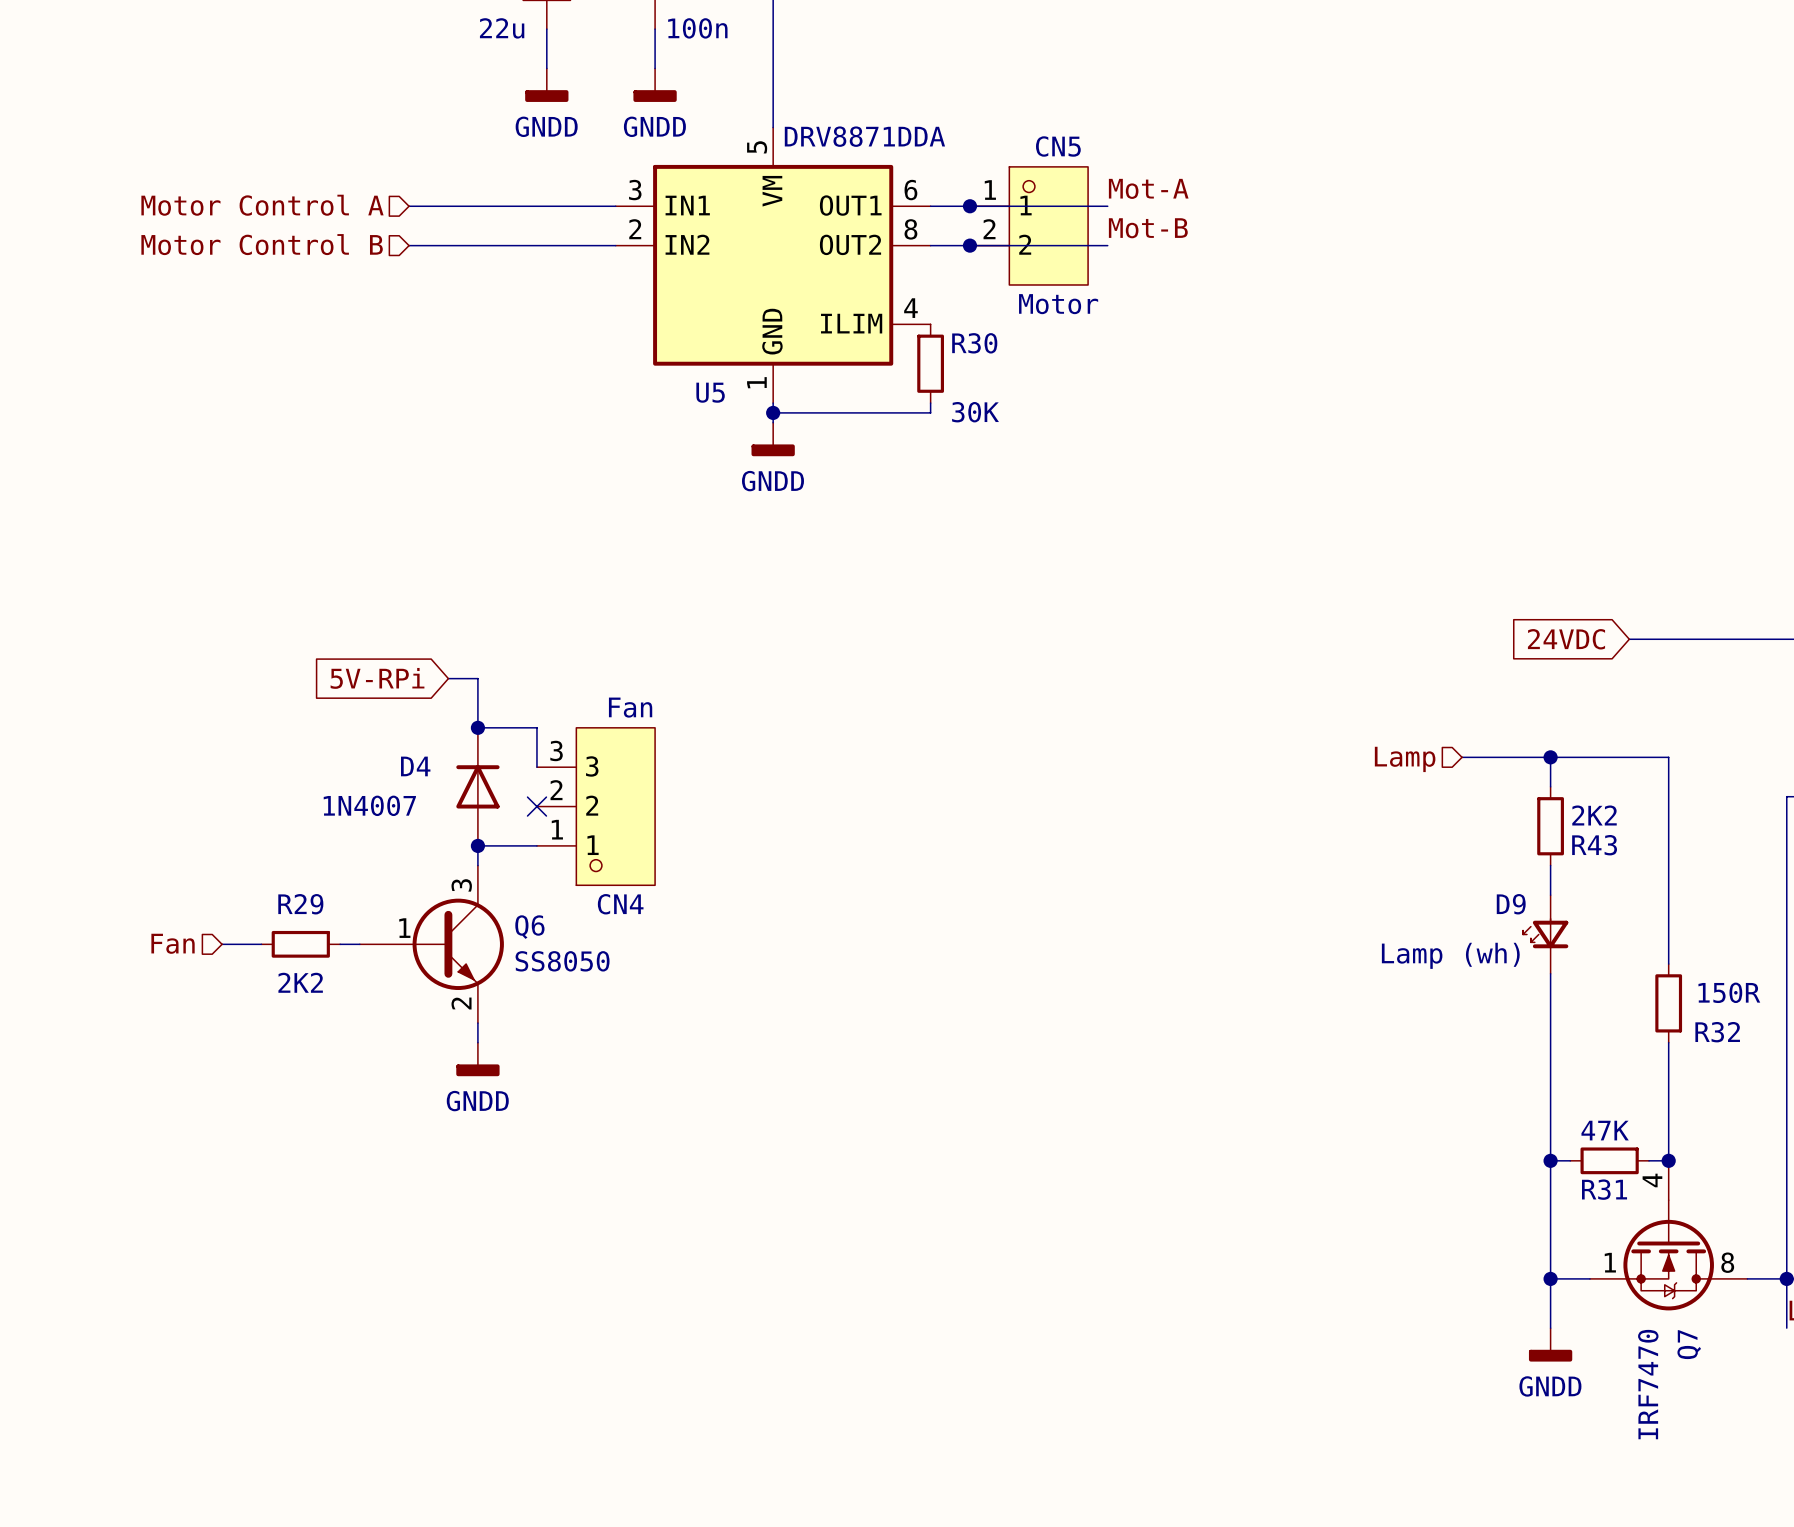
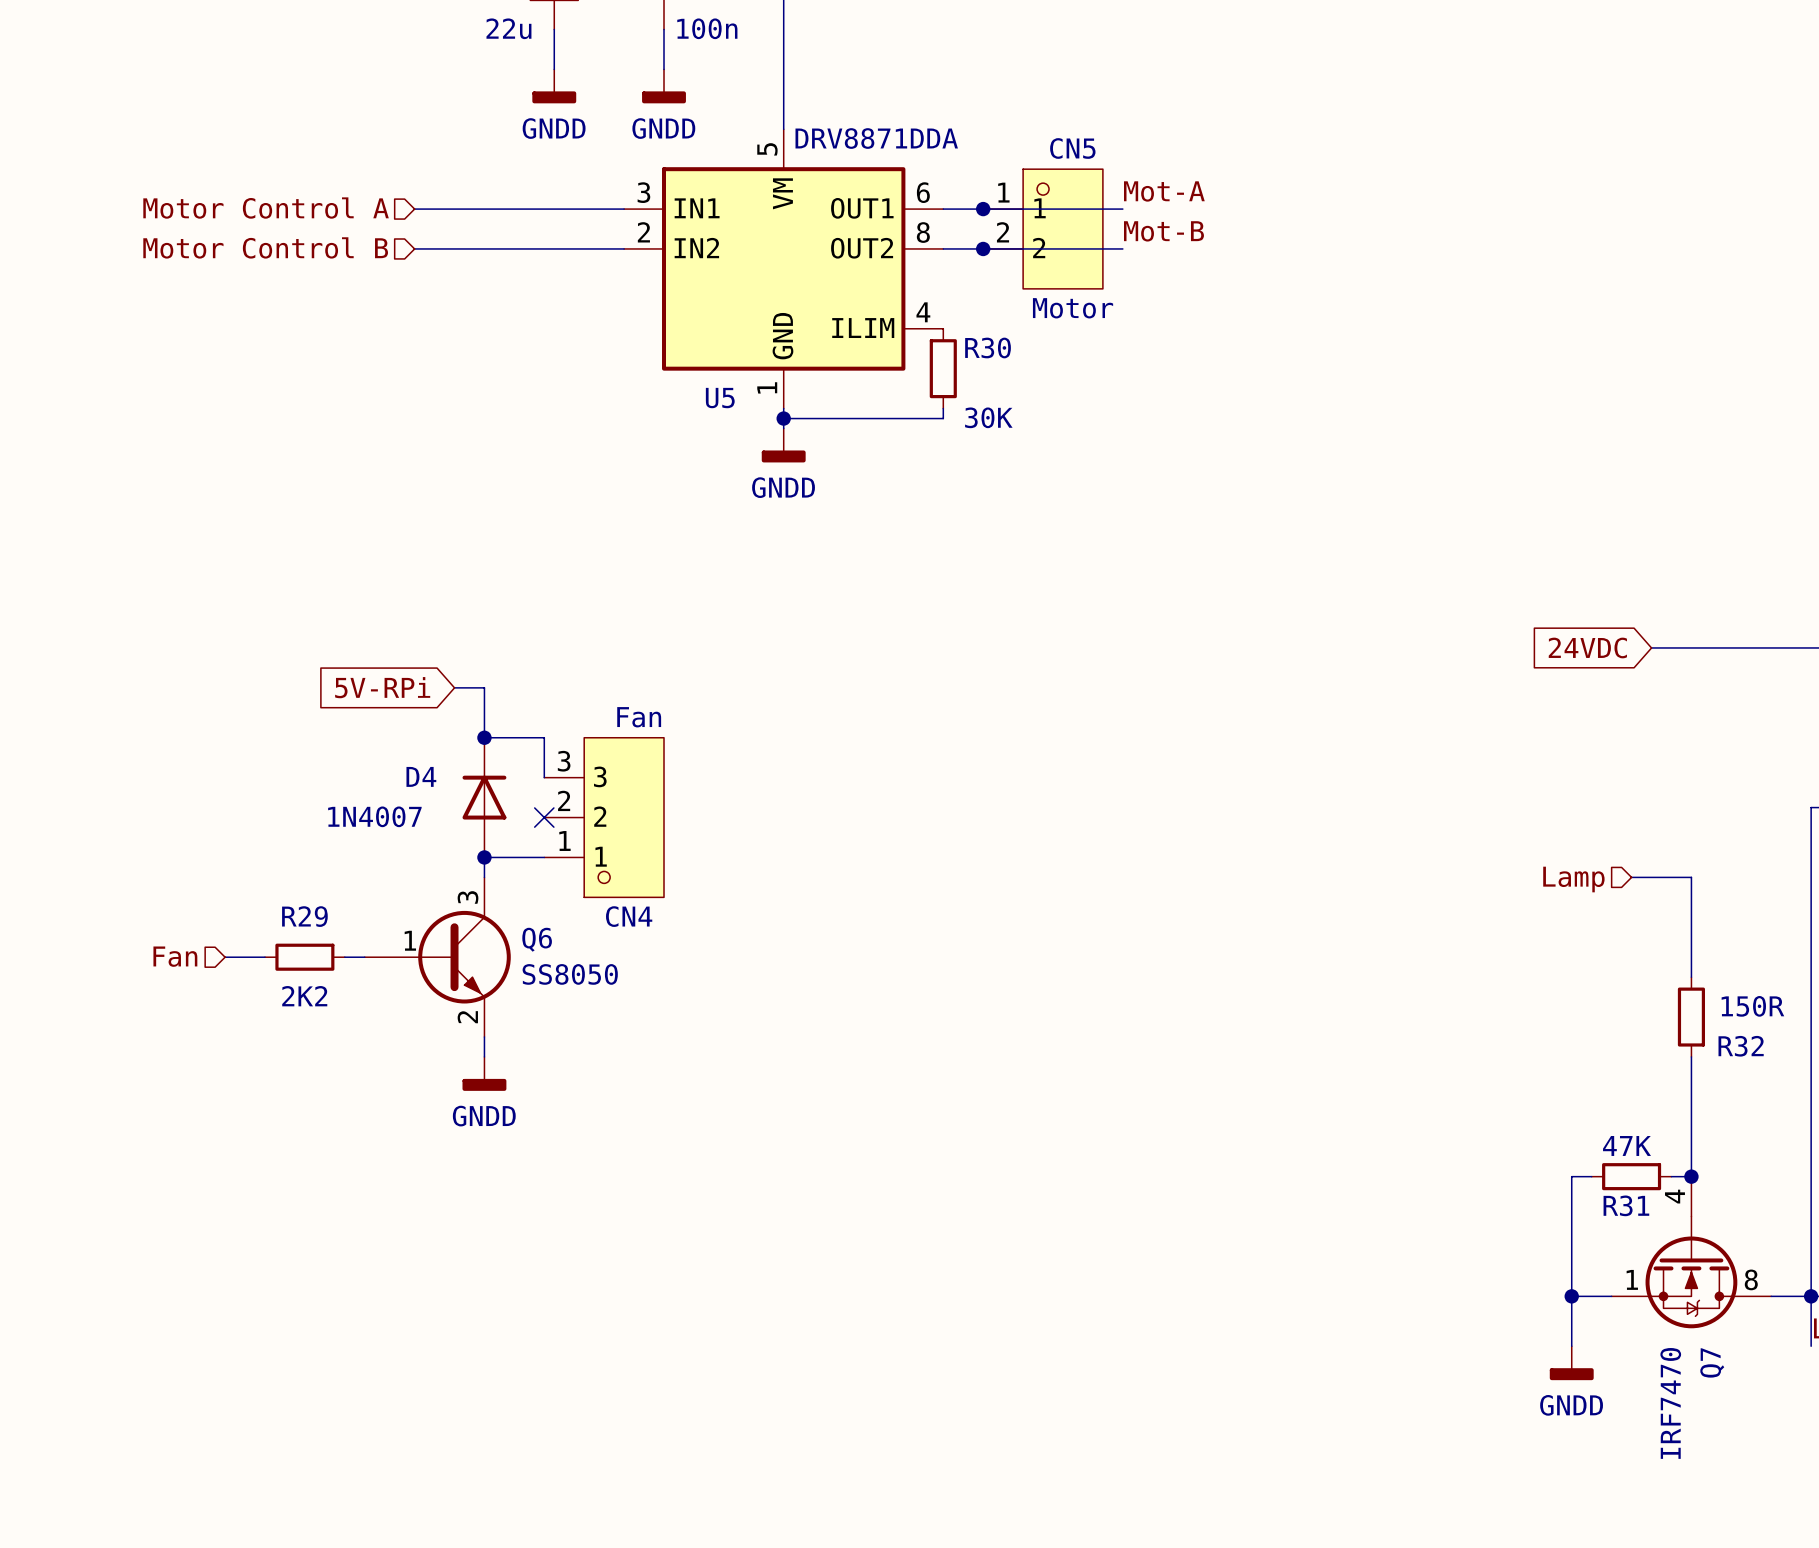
wire: (1462, 757) (1668, 757) (1668, 865) -> (1631, 877) (1691, 877)
wire: (1550, 757) (1550, 786) -> none
junction: (1550, 757) -> none
hierarchical label position: Lamp (1405, 759) -> Lamp (1573, 879)
R43: 2K2 (1550, 826) -> none
wire: (1550, 865) (1550, 895) -> none
D9: Lamp (wh) (1545, 934) -> none
wire: (1550, 973) (1550, 1160) -> none
junction: (1550, 1160) -> none

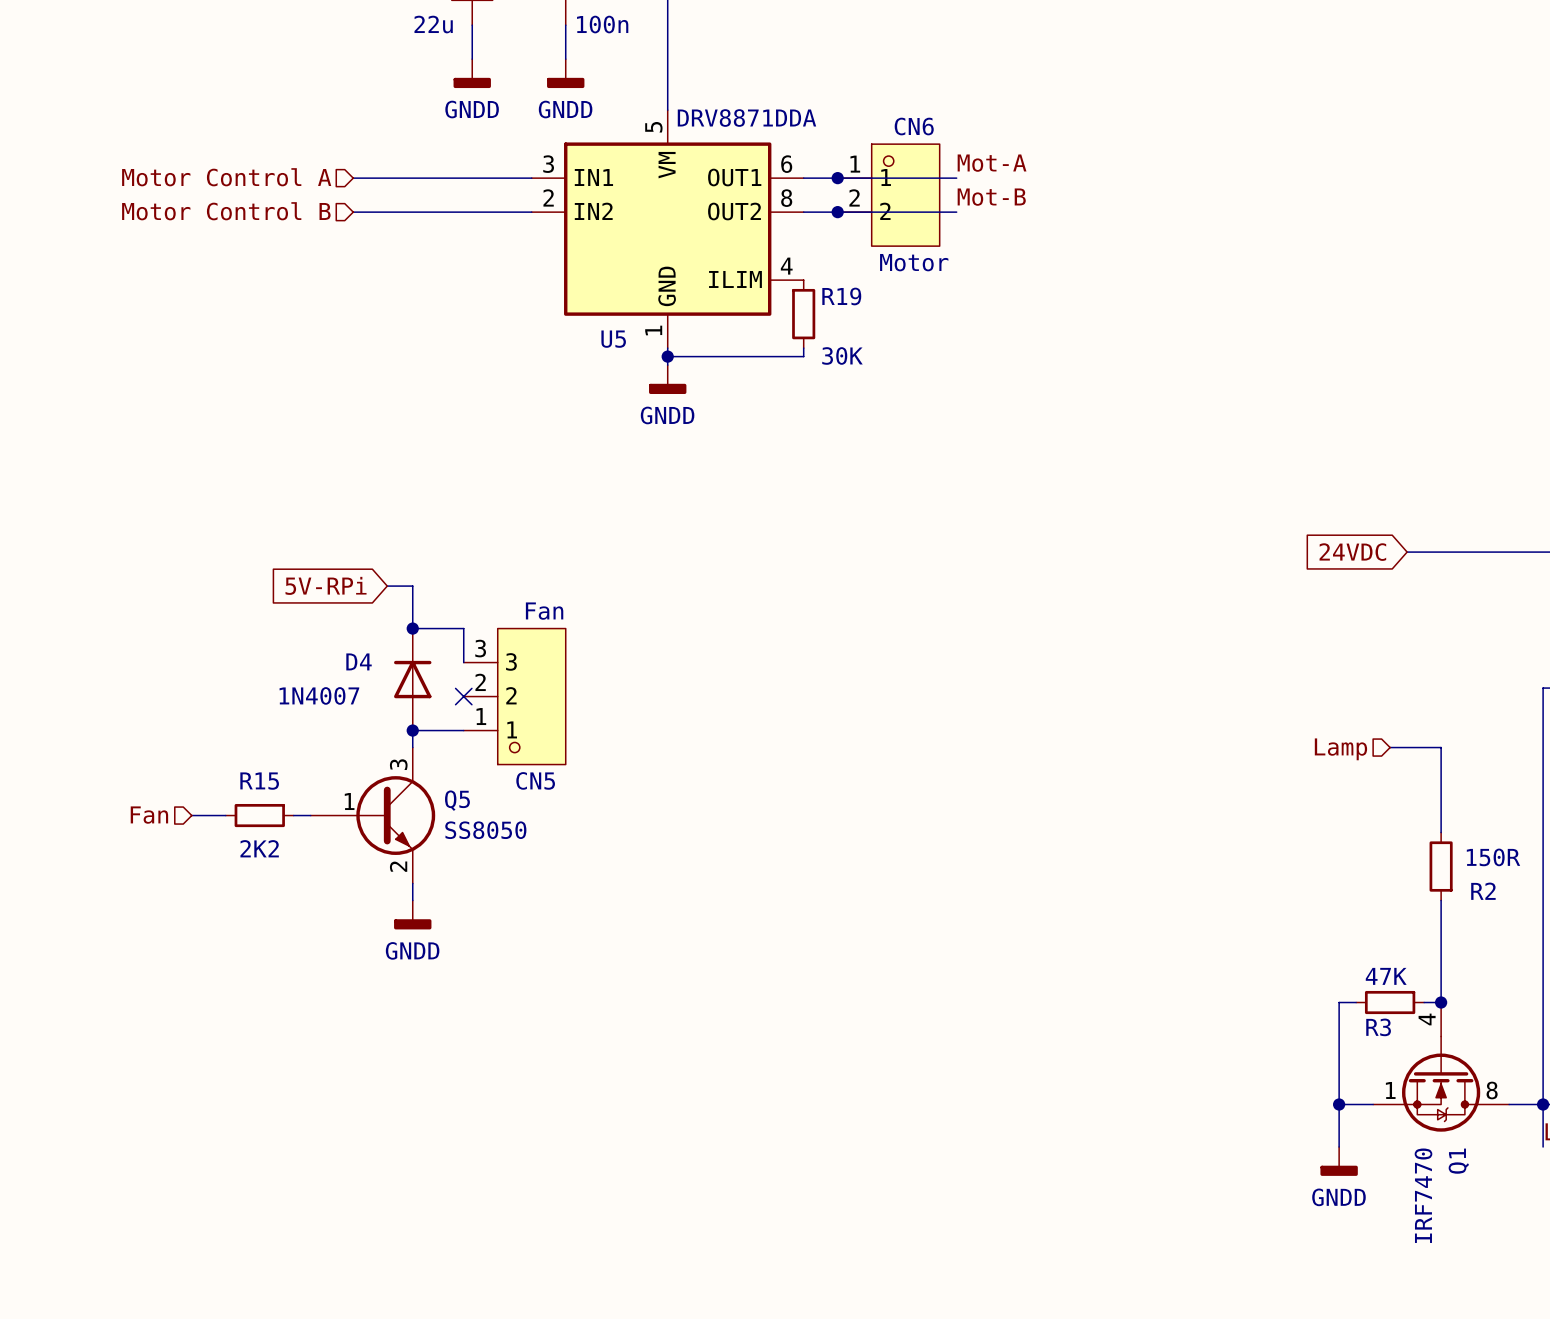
CN5 name: CN5 (1072, 148) -> CN6 (914, 126)
R30 name: R30 (988, 347) -> R19 (841, 296)
R29 name: R29 (304, 916) -> R15 (259, 781)
CN4 name: CN4 (629, 916) -> CN5 (535, 780)
Q6 name: Q6 (537, 939) -> Q5 (457, 800)
R32 name: R32 (1741, 1046) -> R2 (1483, 891)
R31 name: R31 (1626, 1205) -> R3 (1378, 1027)
Q7 name: Q7 (1712, 1362) -> Q1 (1458, 1161)

